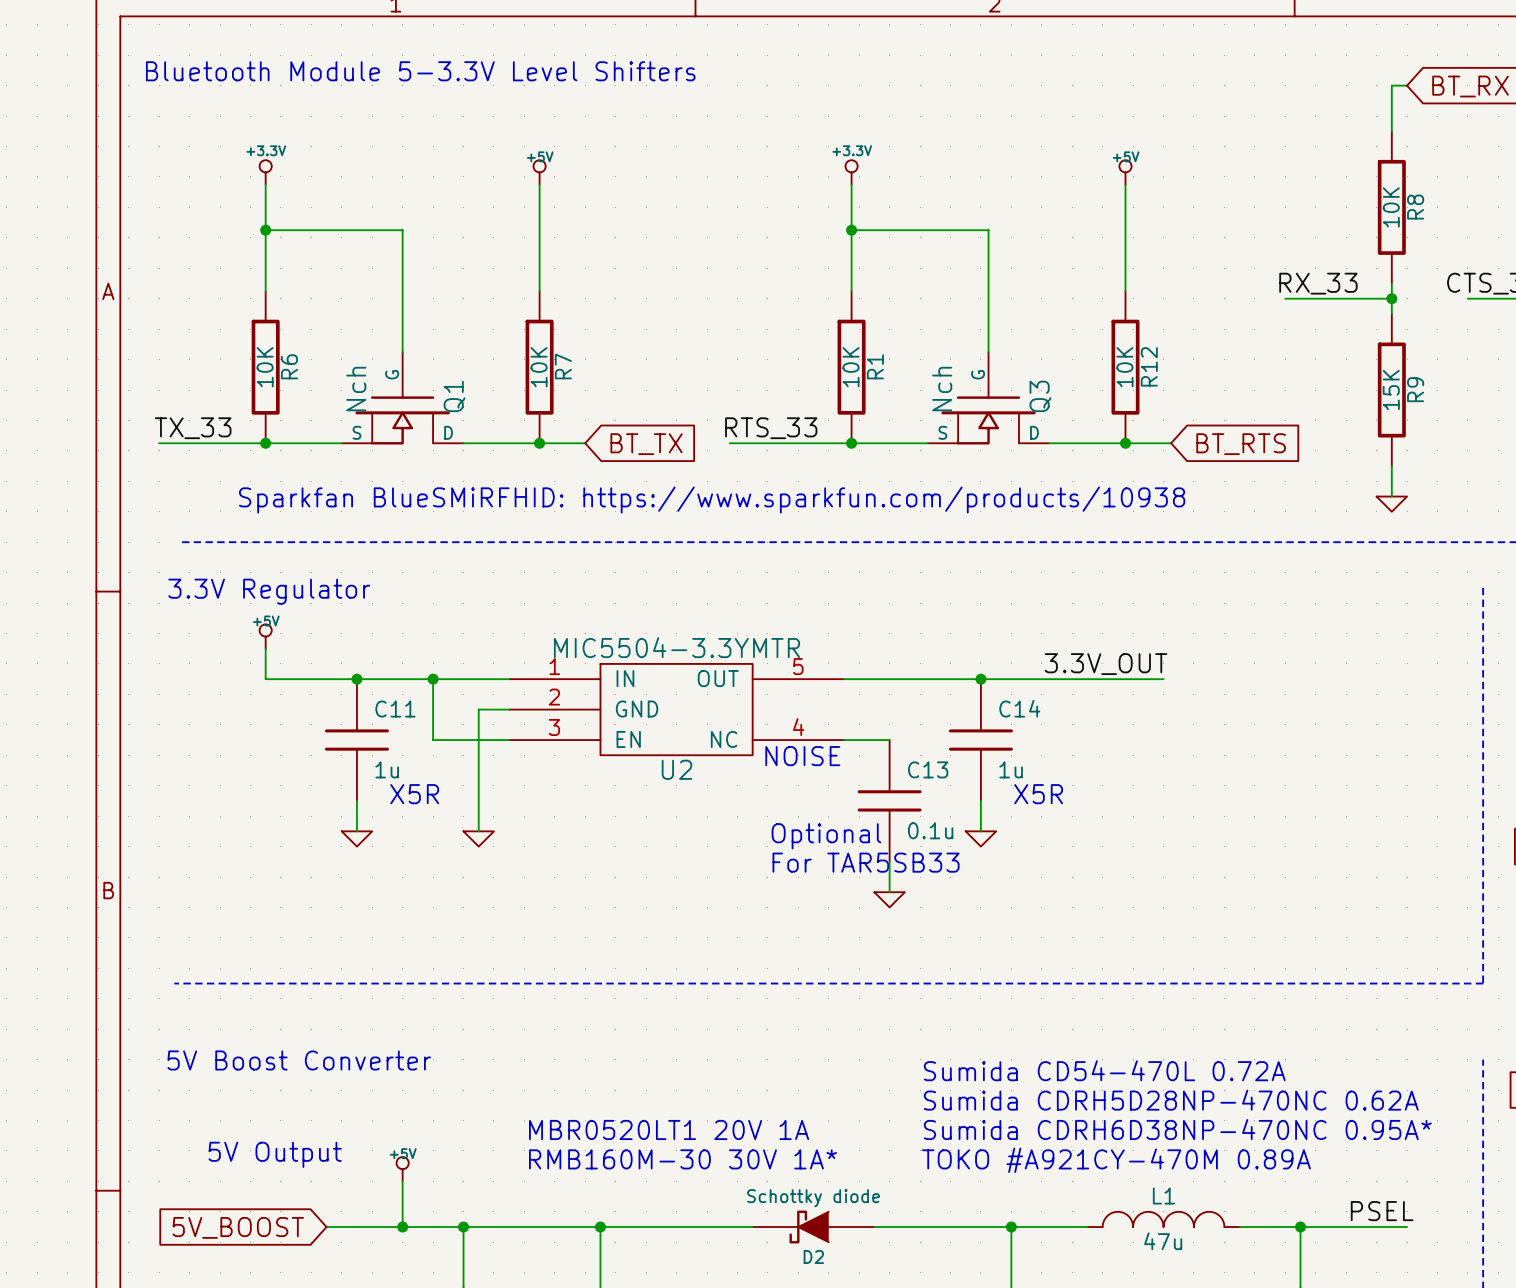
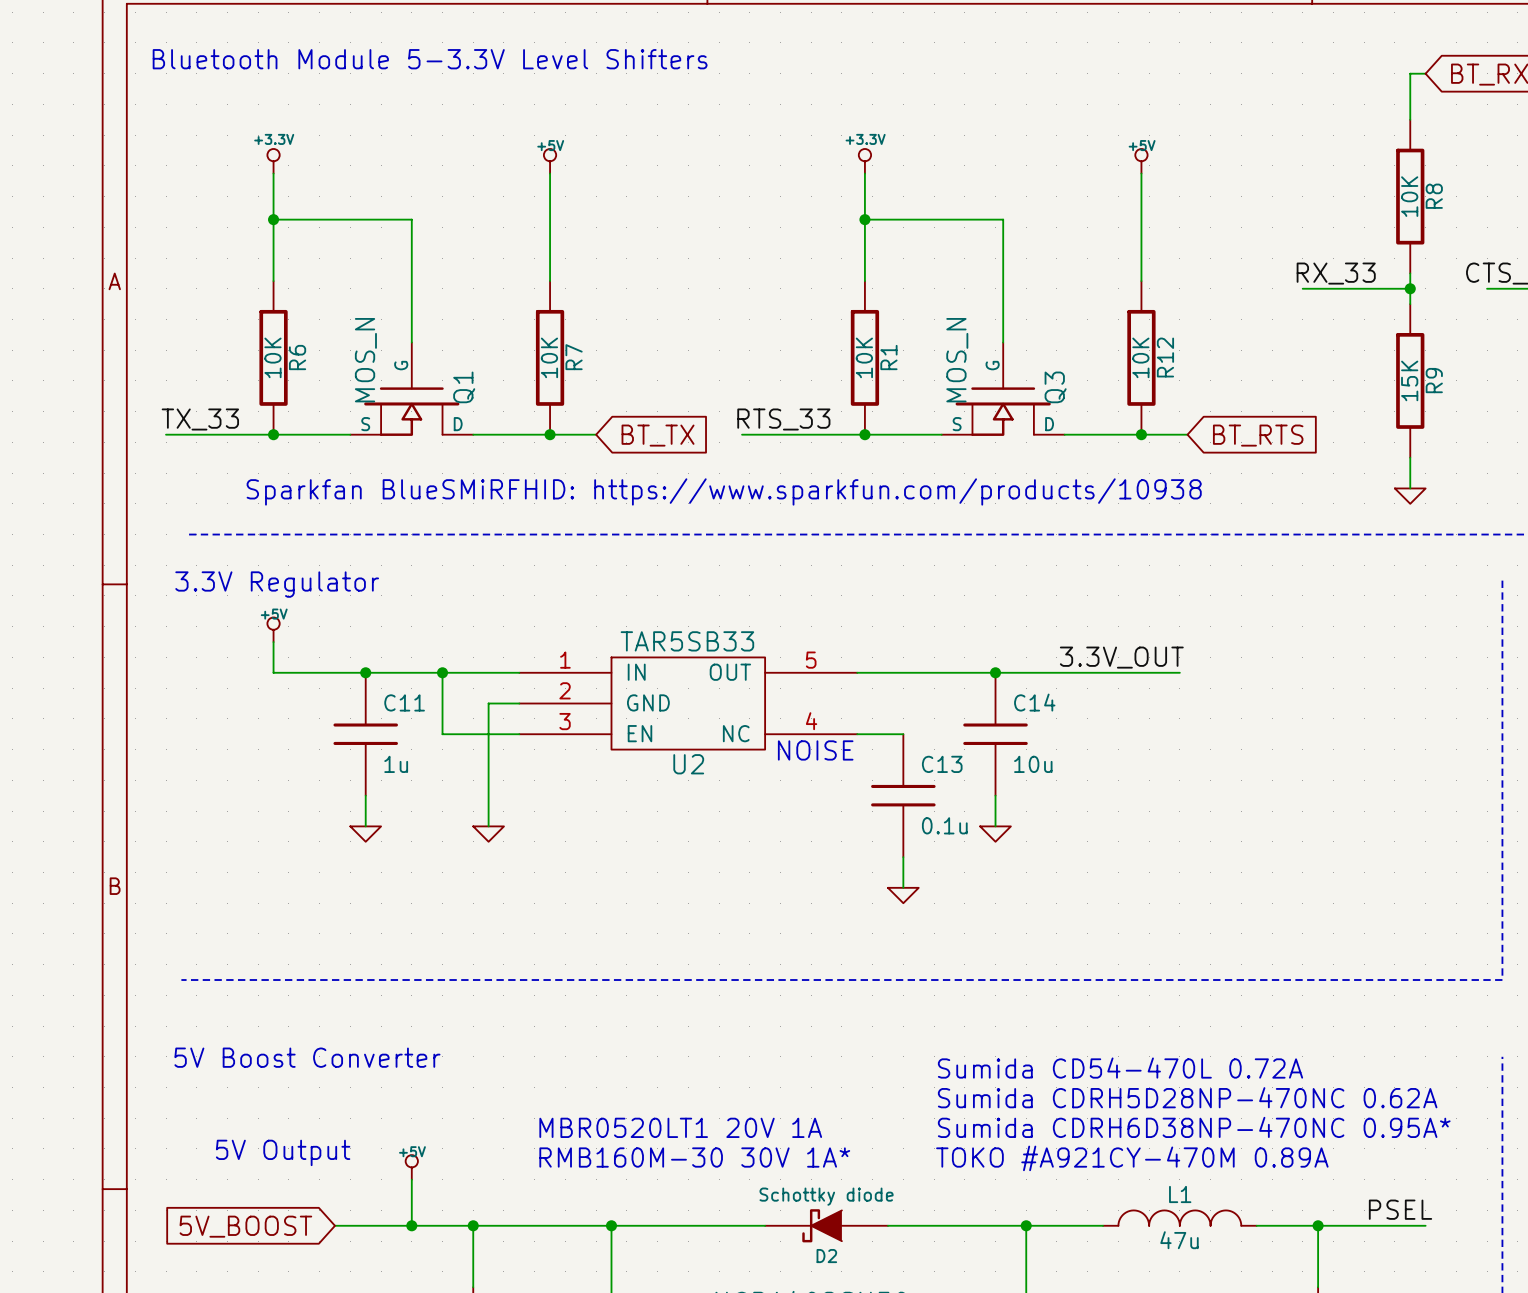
Q1 value: Nch (356, 389) -> MOS_N (365, 360)
Q3 value: Nch (942, 389) -> MOS_N (957, 360)
U2 value: MIC5504-3.3YMTR (677, 647) -> TAR5SB33 (687, 641)
C14 value: 1u (1011, 769) -> 10u (1033, 764)
text: X5R (414, 794) -> none
text: X5R (1038, 794) -> none
text: Optional (826, 836) -> none
text: For TAR5SB33 (866, 862) -> none

